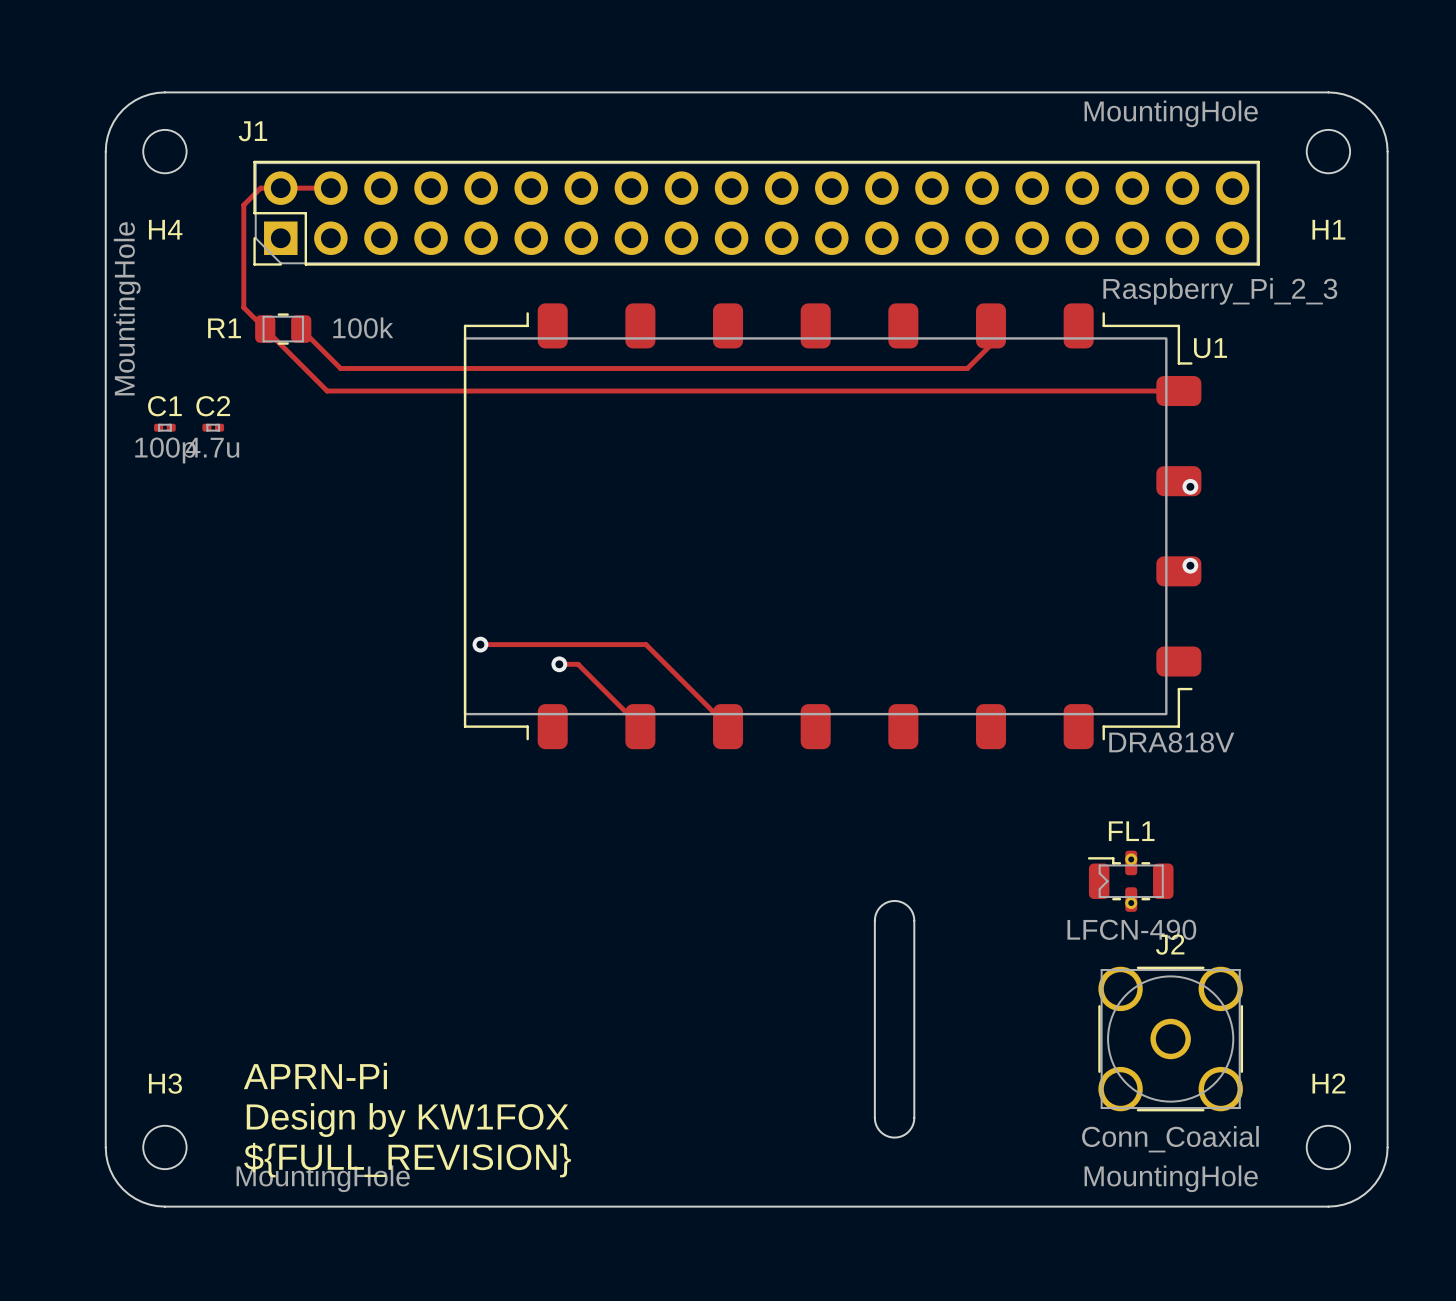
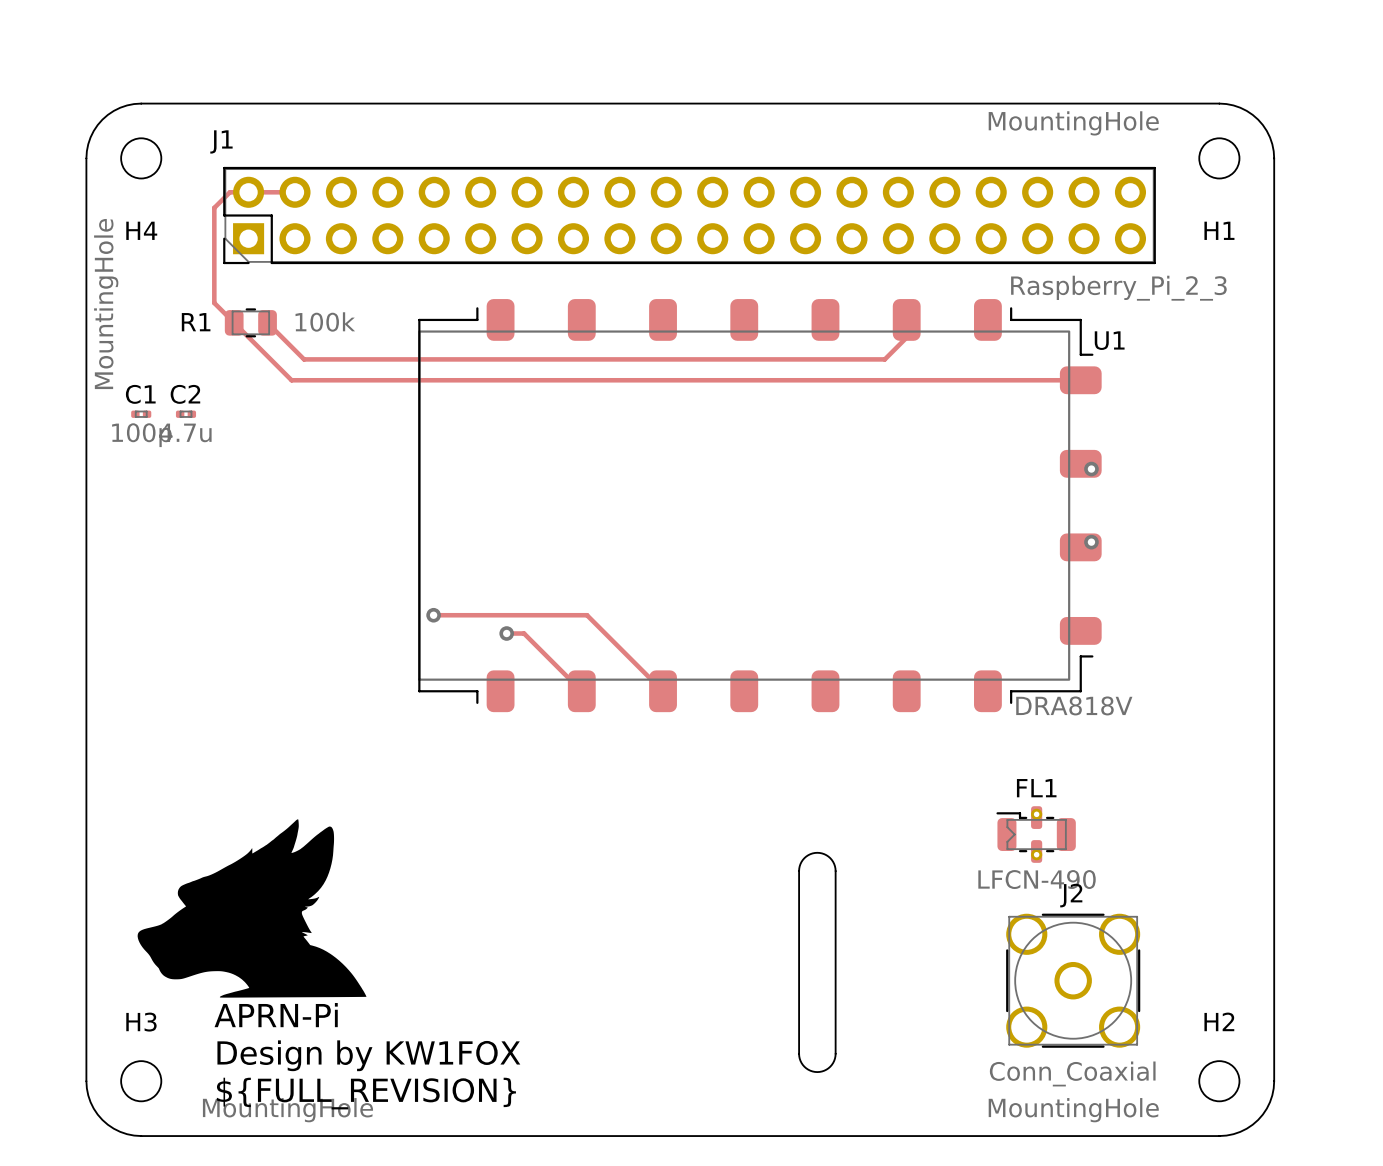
part: none -> (252, 908)

